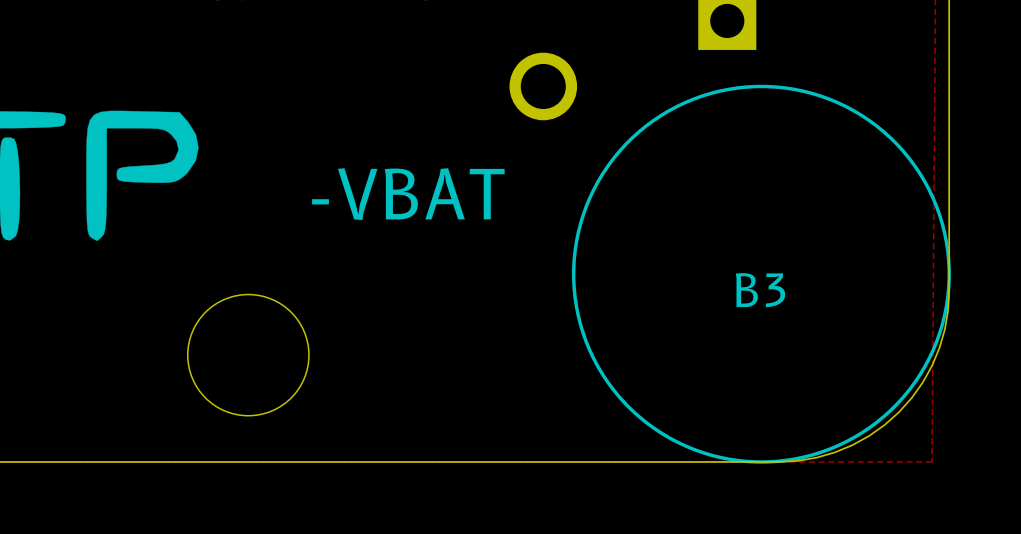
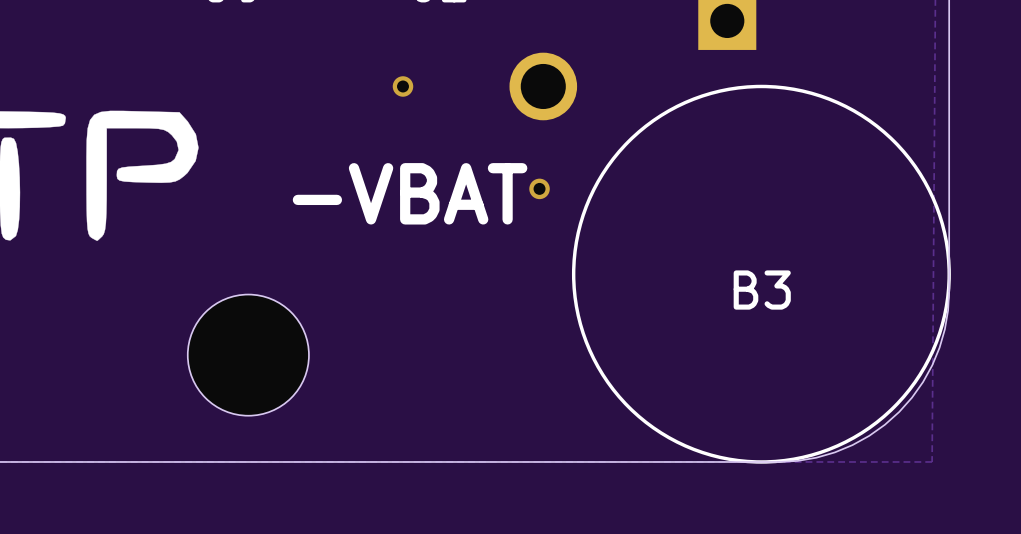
via: none -> (402, 86)
via: none -> (539, 188)

